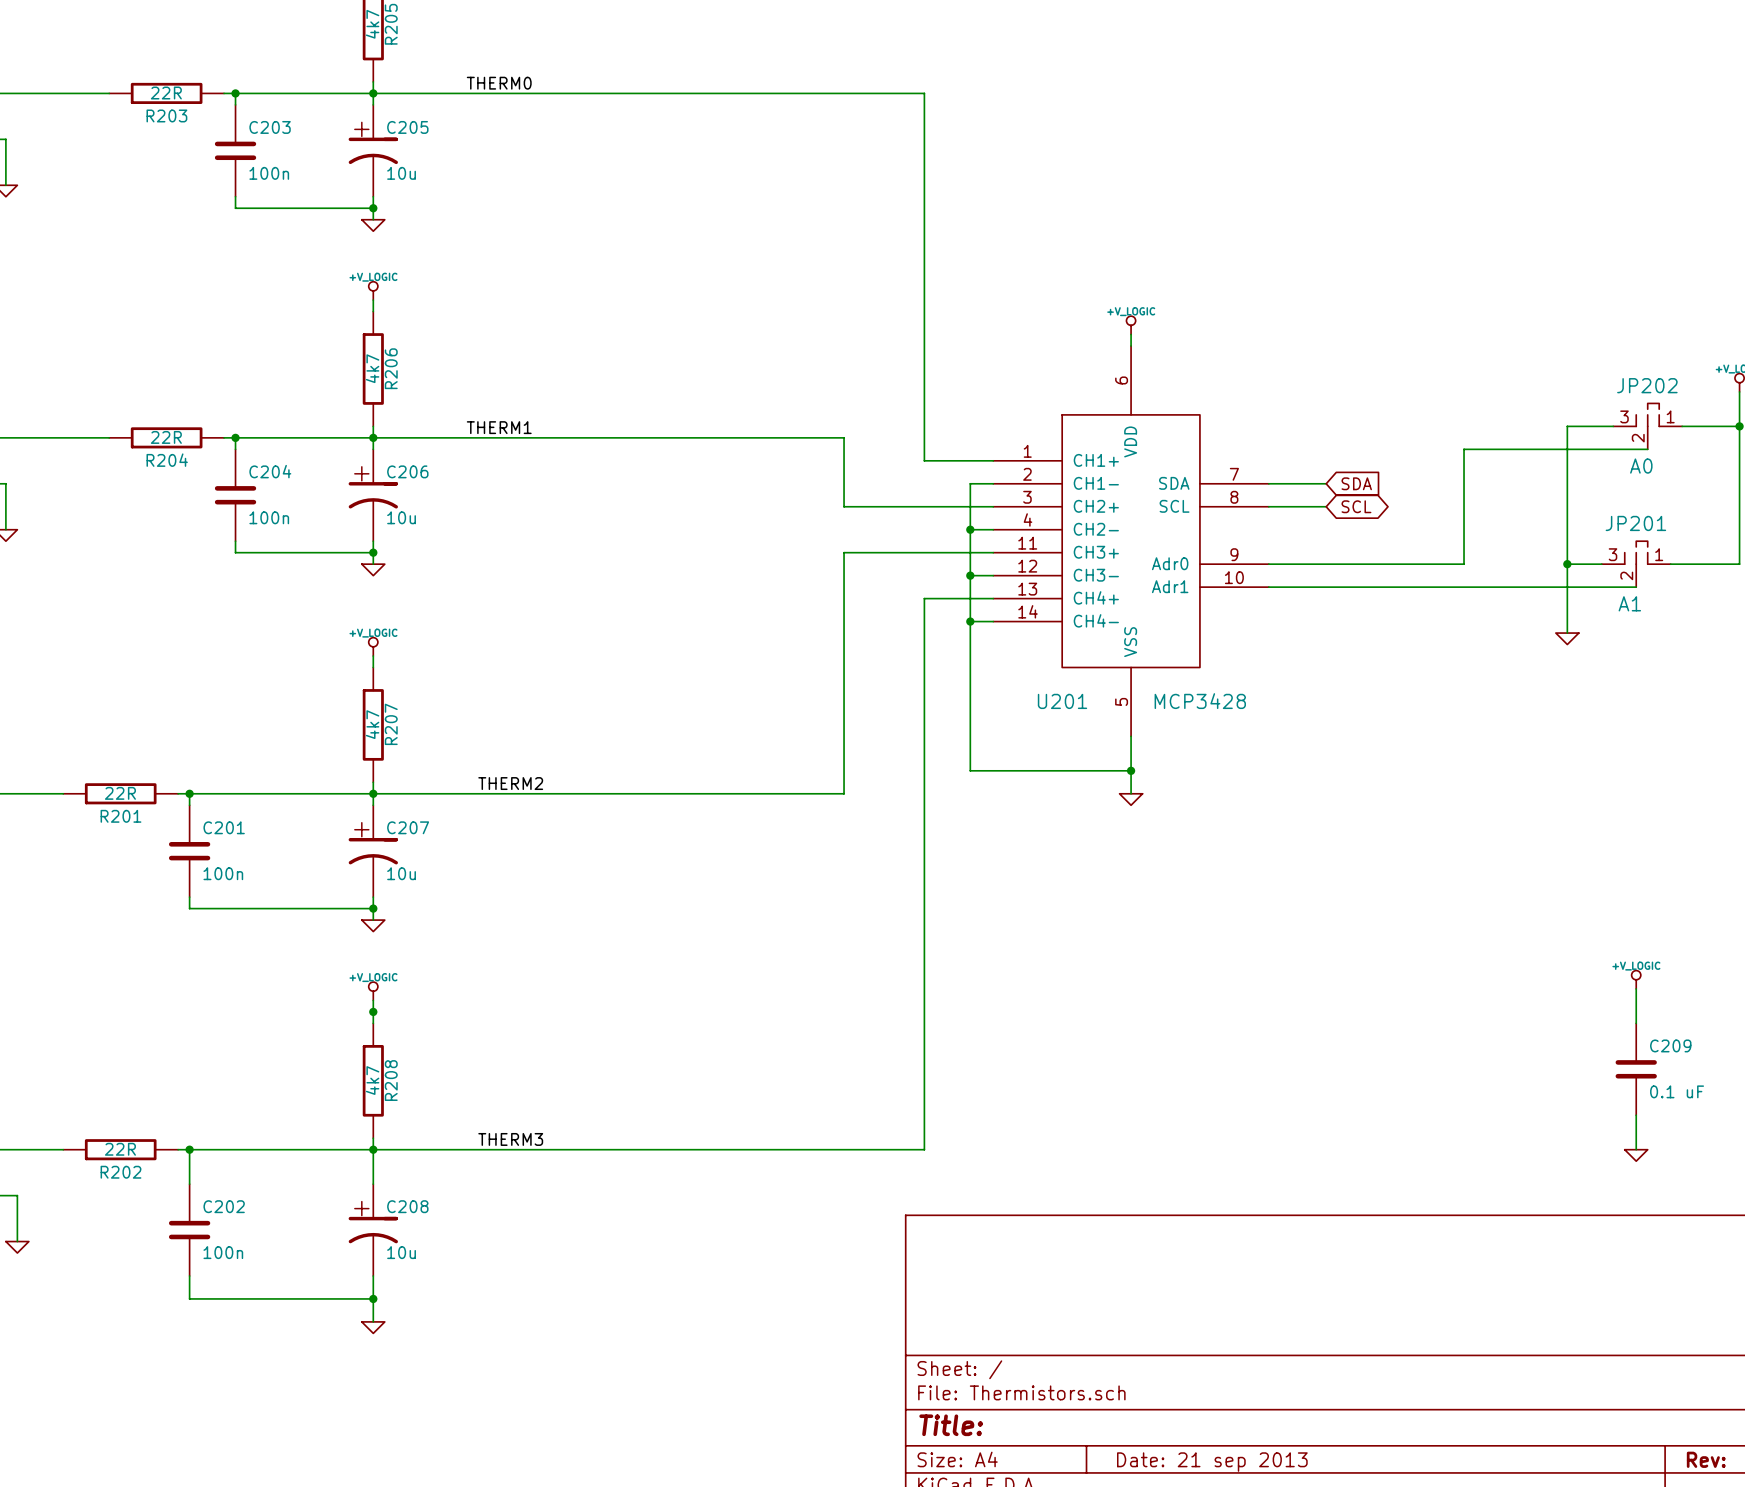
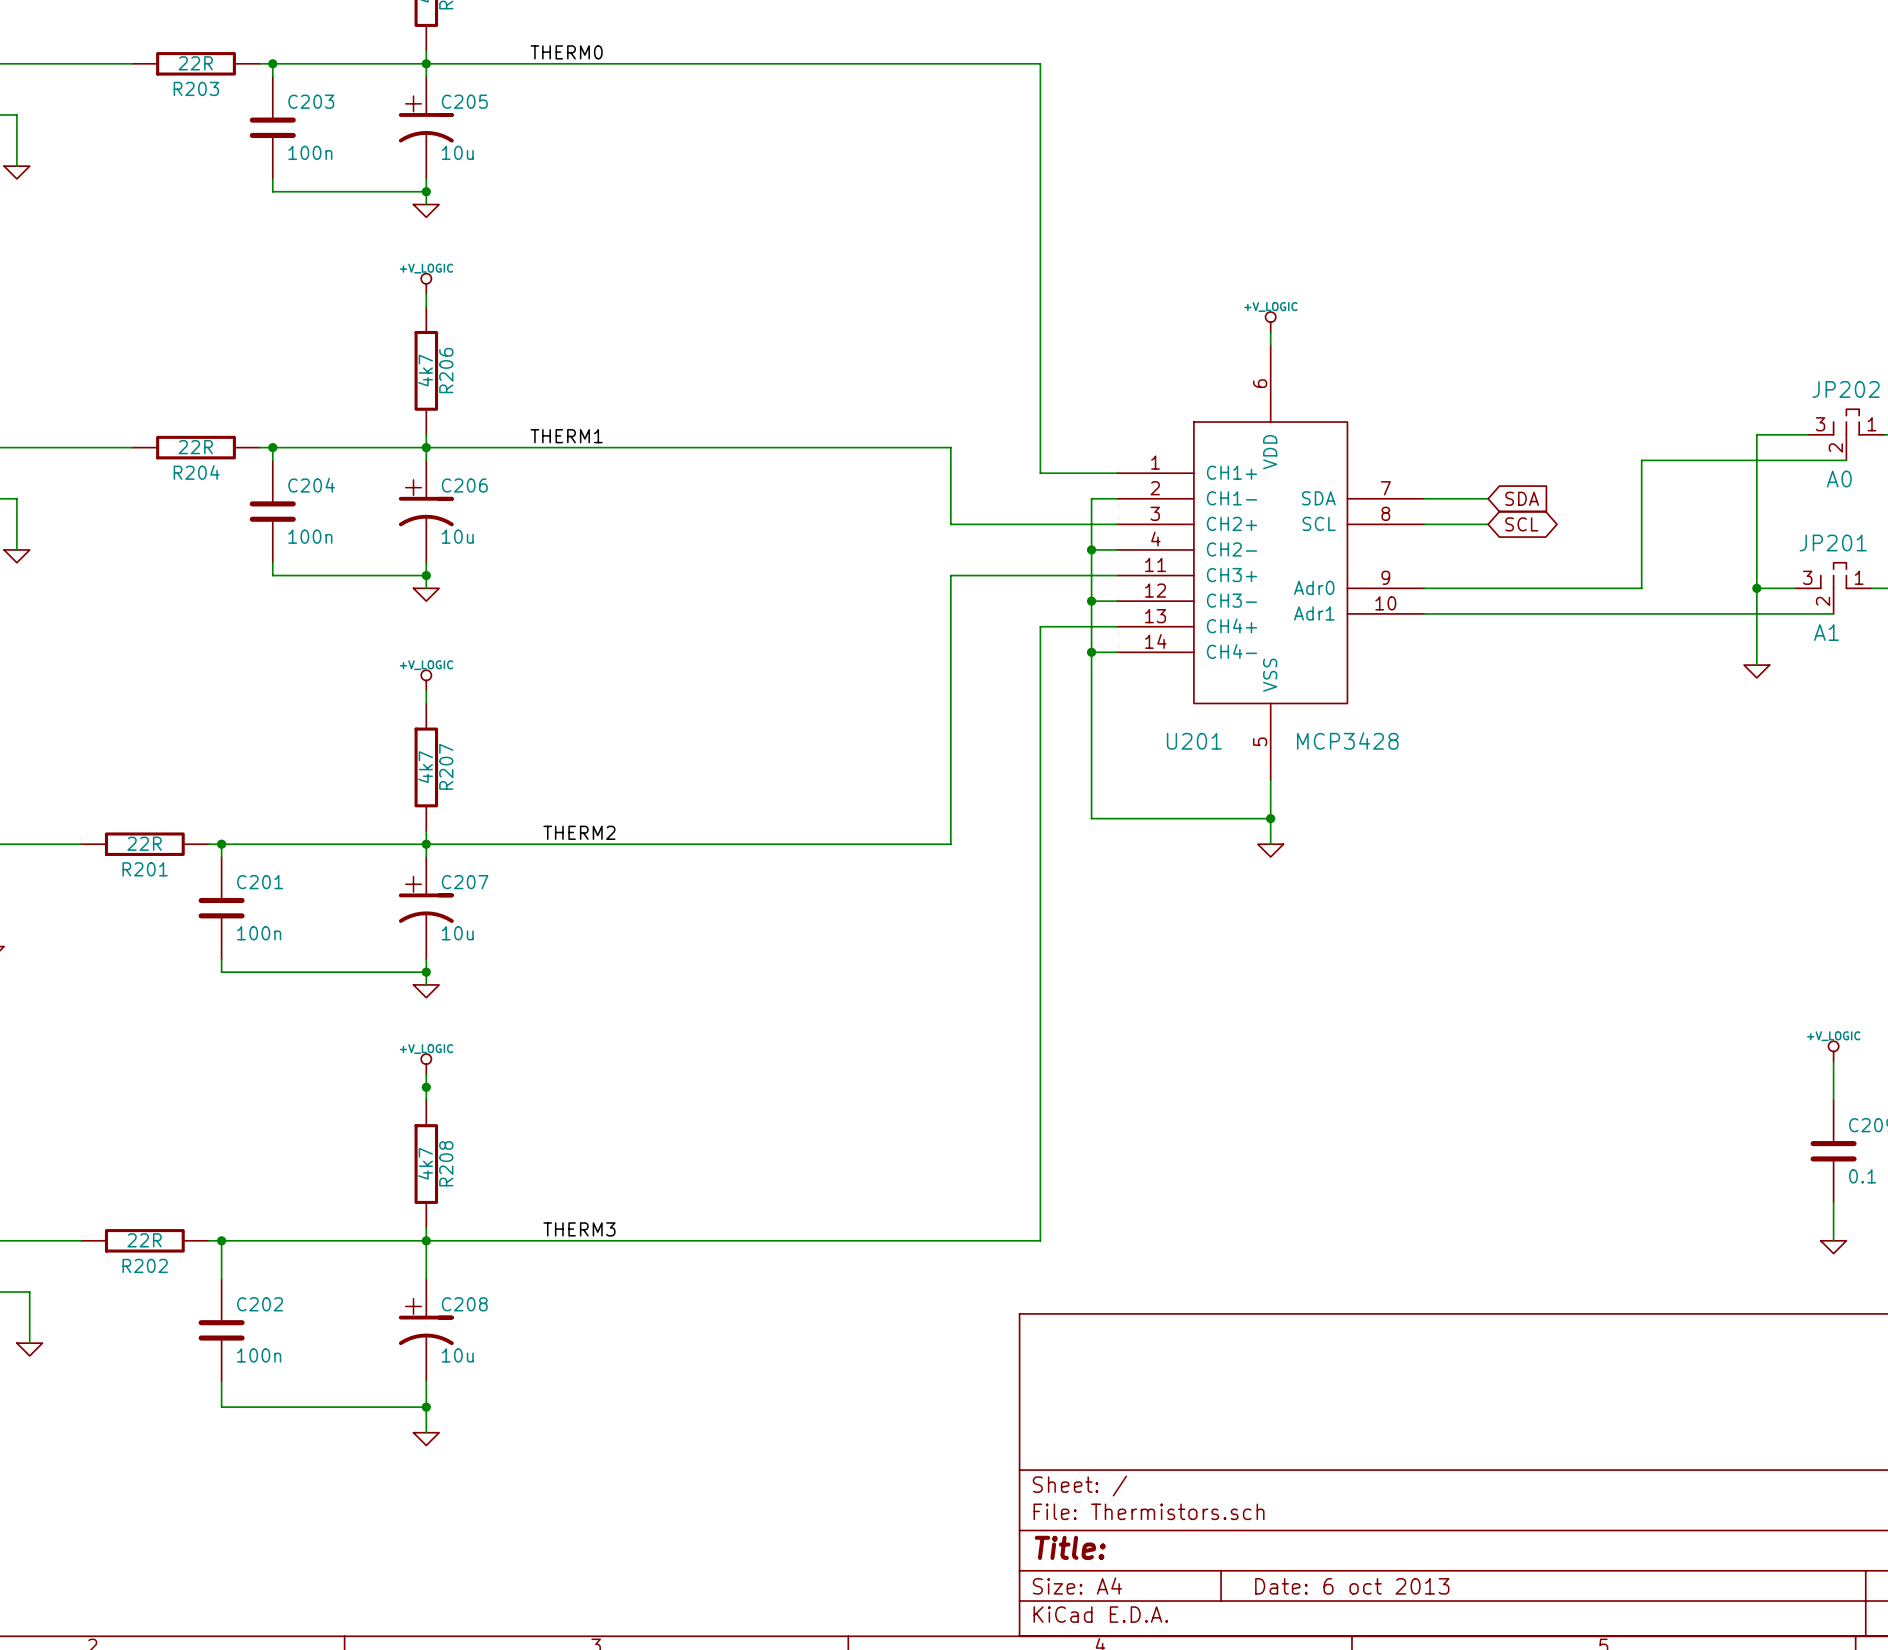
title block: Date: 21 sep 2013 (1212, 1462) -> Date: 6 oct 2013 (1352, 1586)

